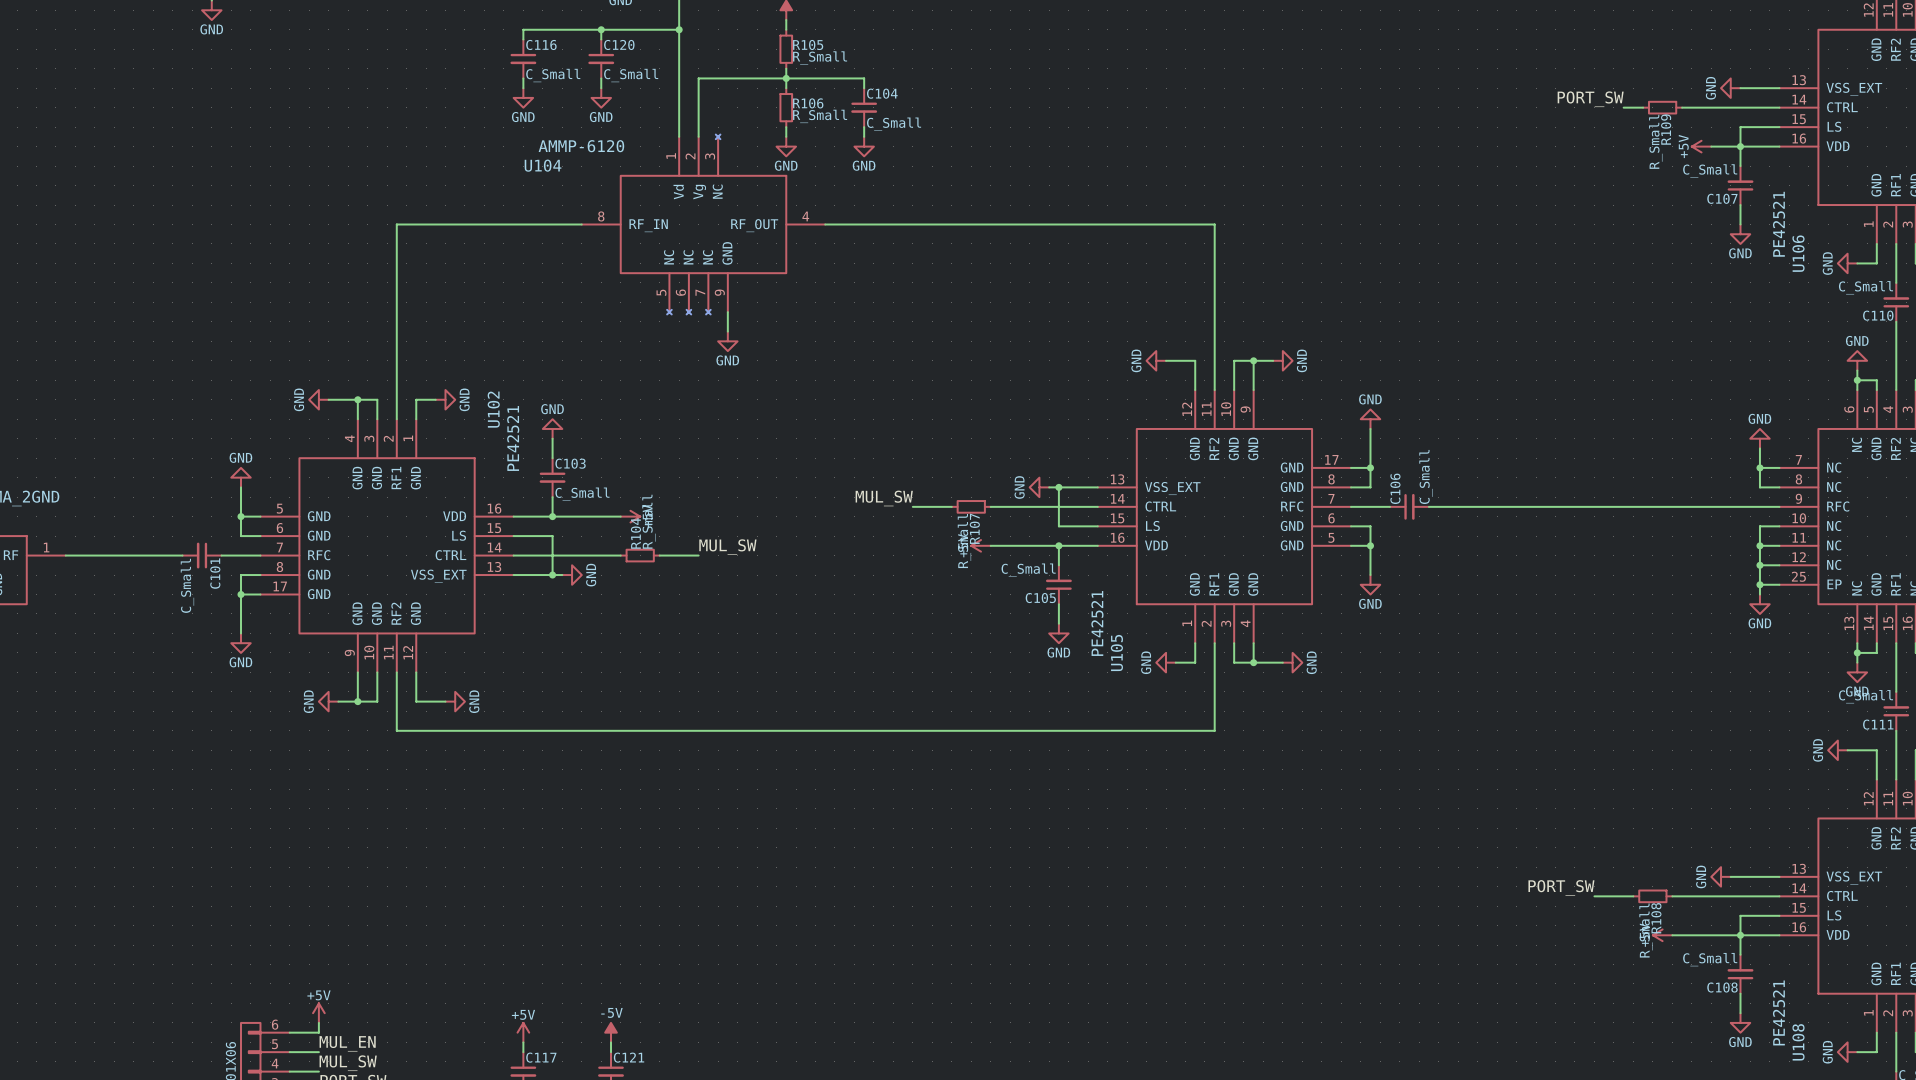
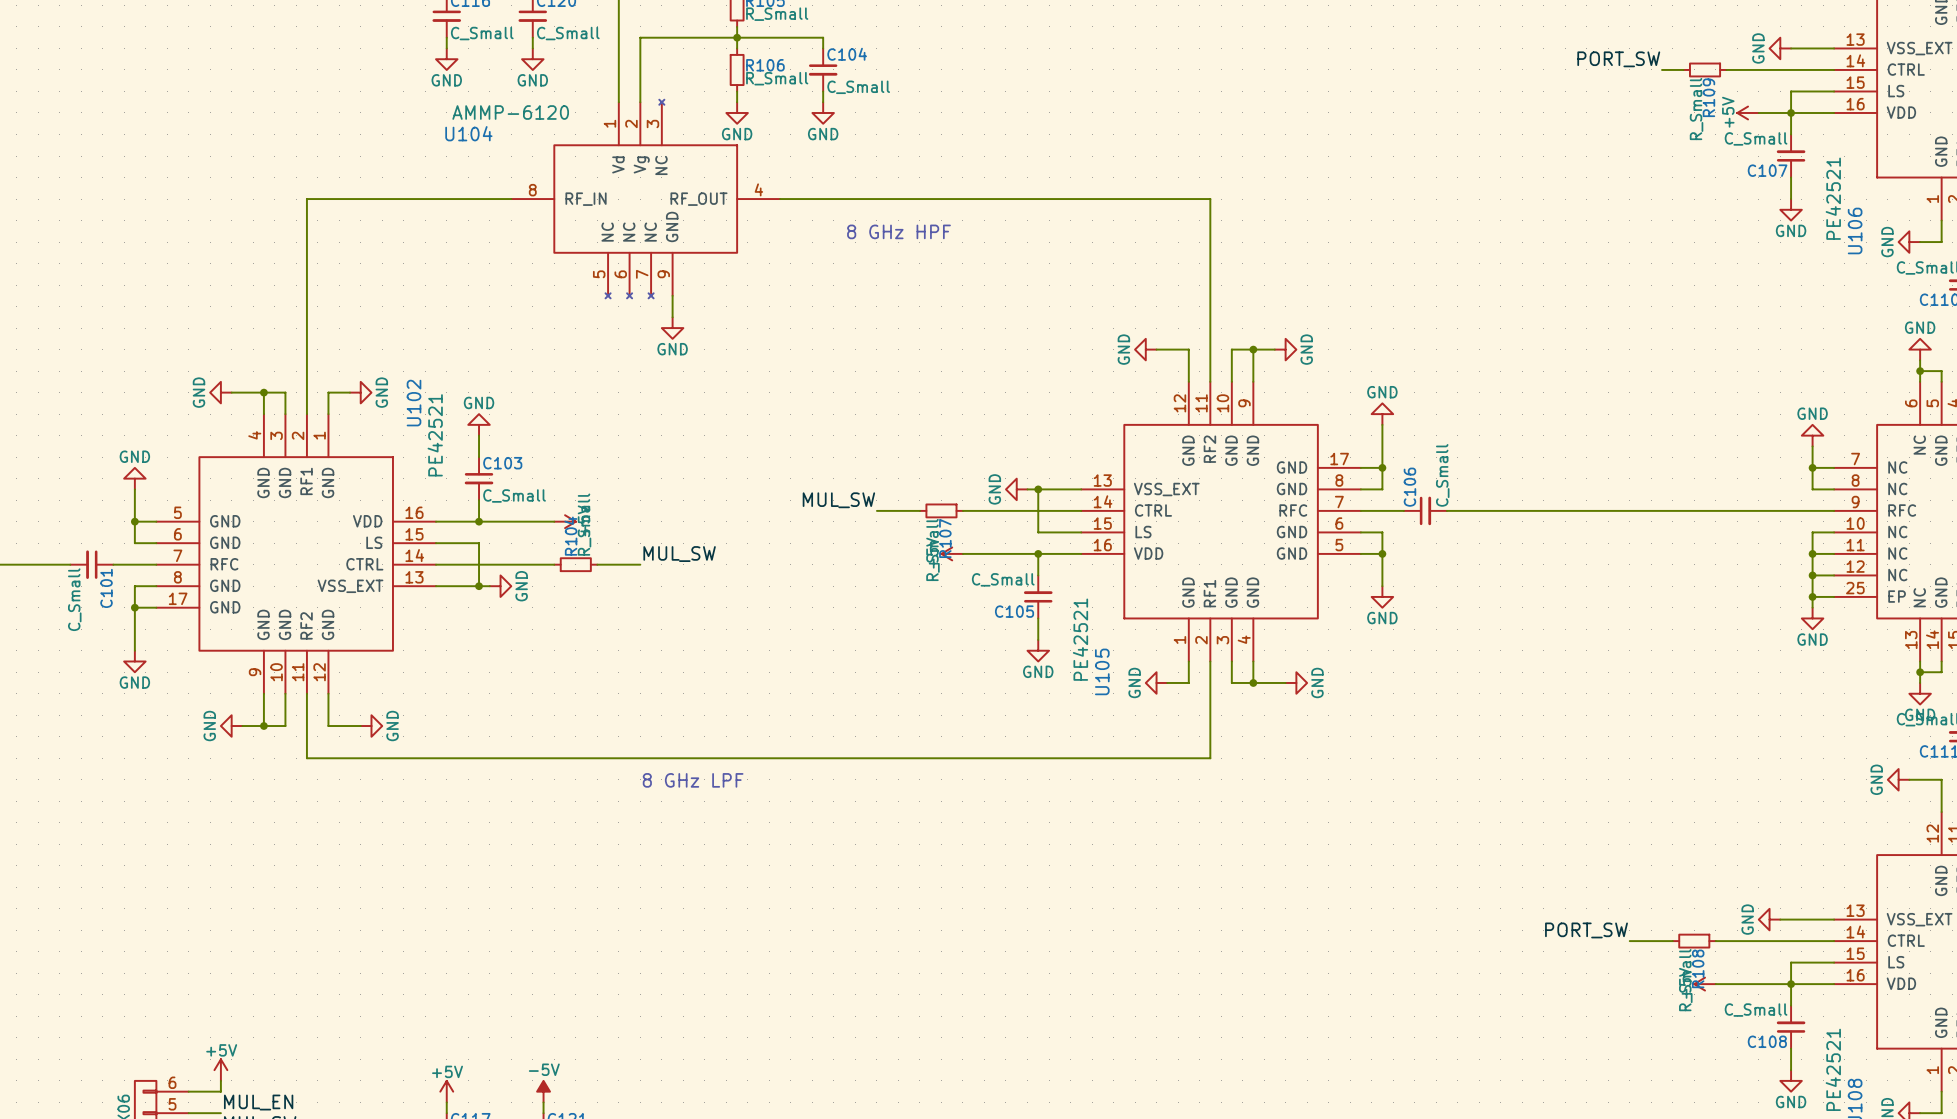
text: none -> 8 GHz HPF (898, 231)
text: none -> 8 GHz LPF (693, 780)

